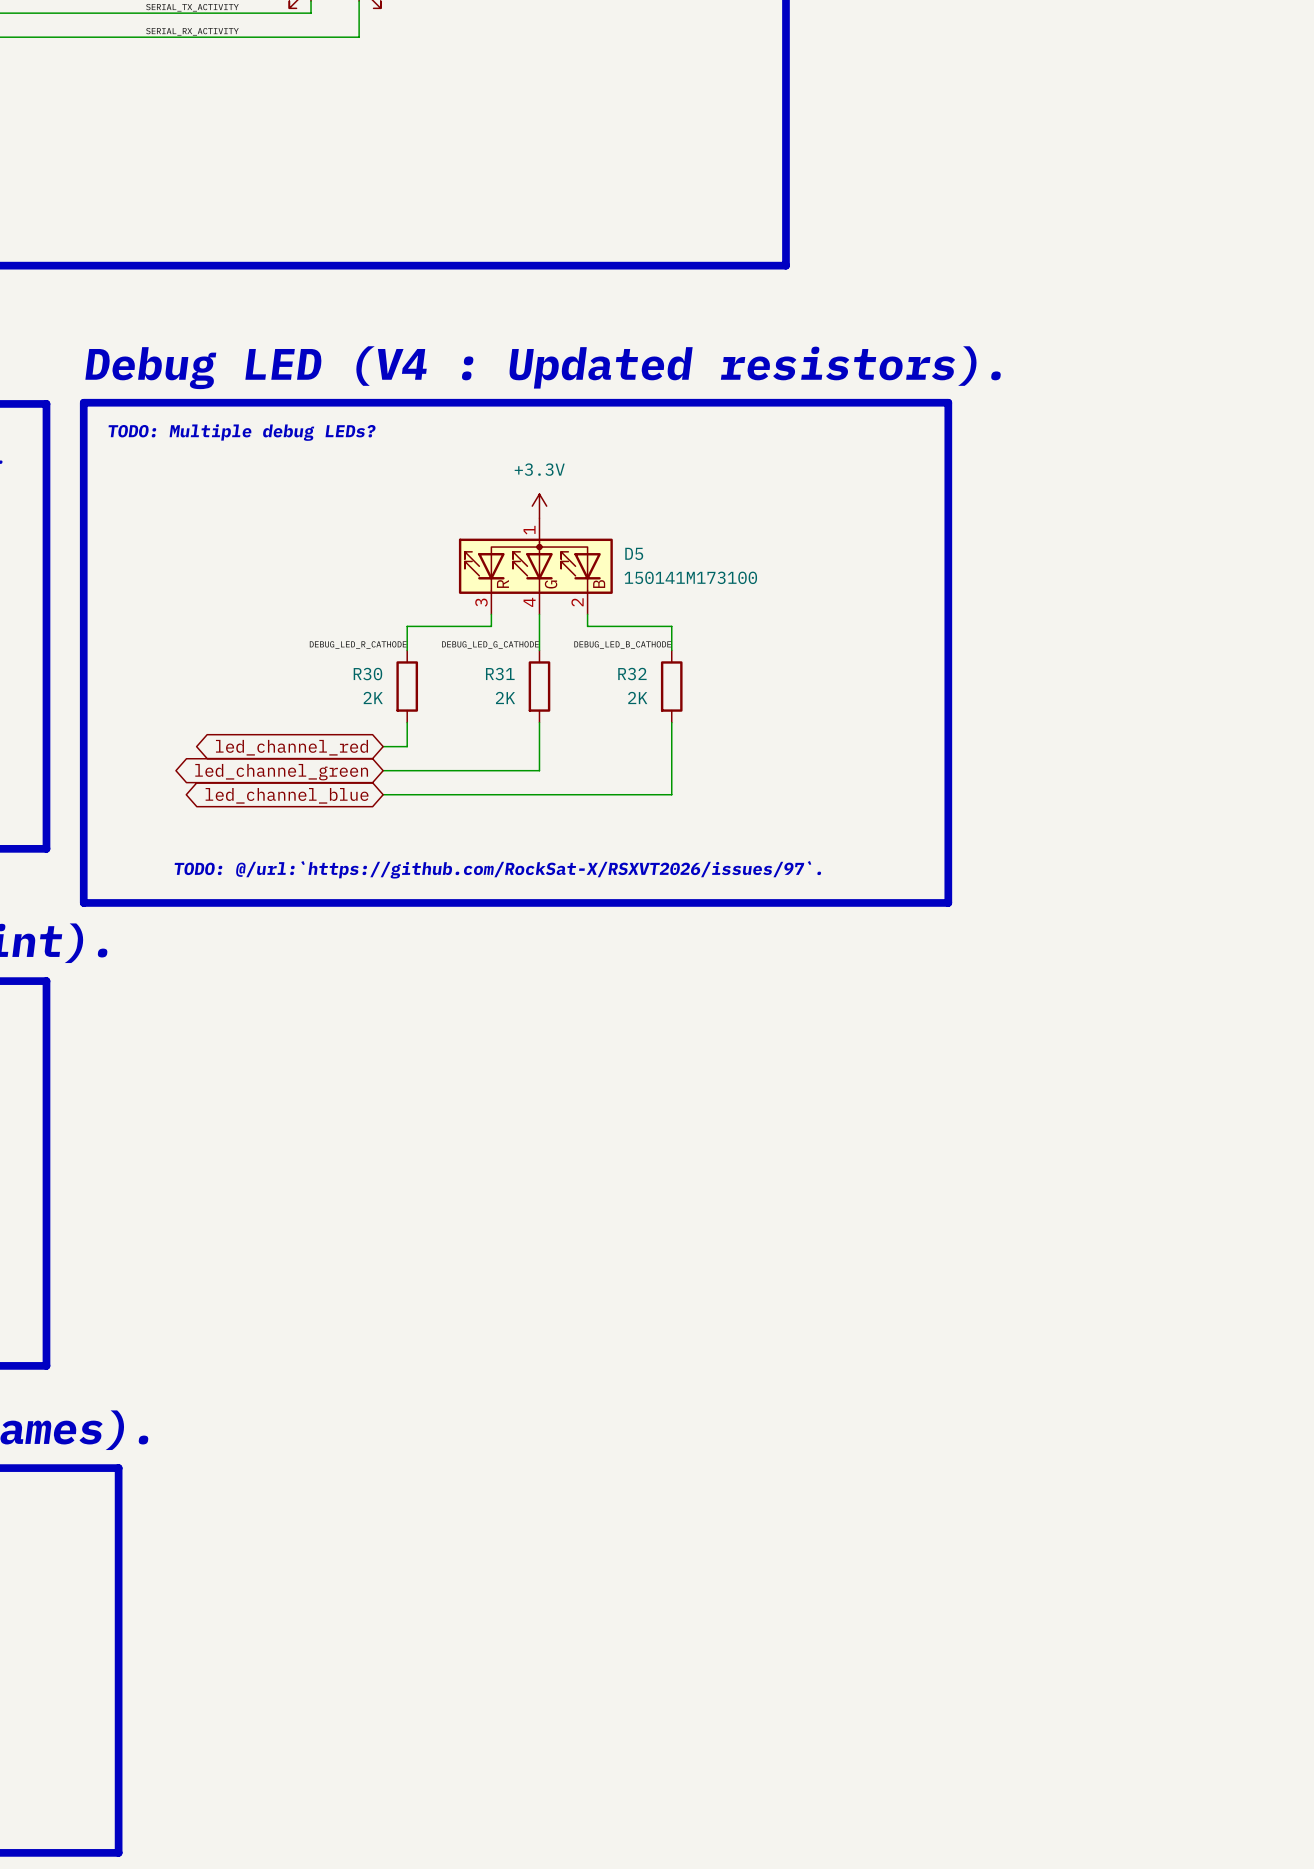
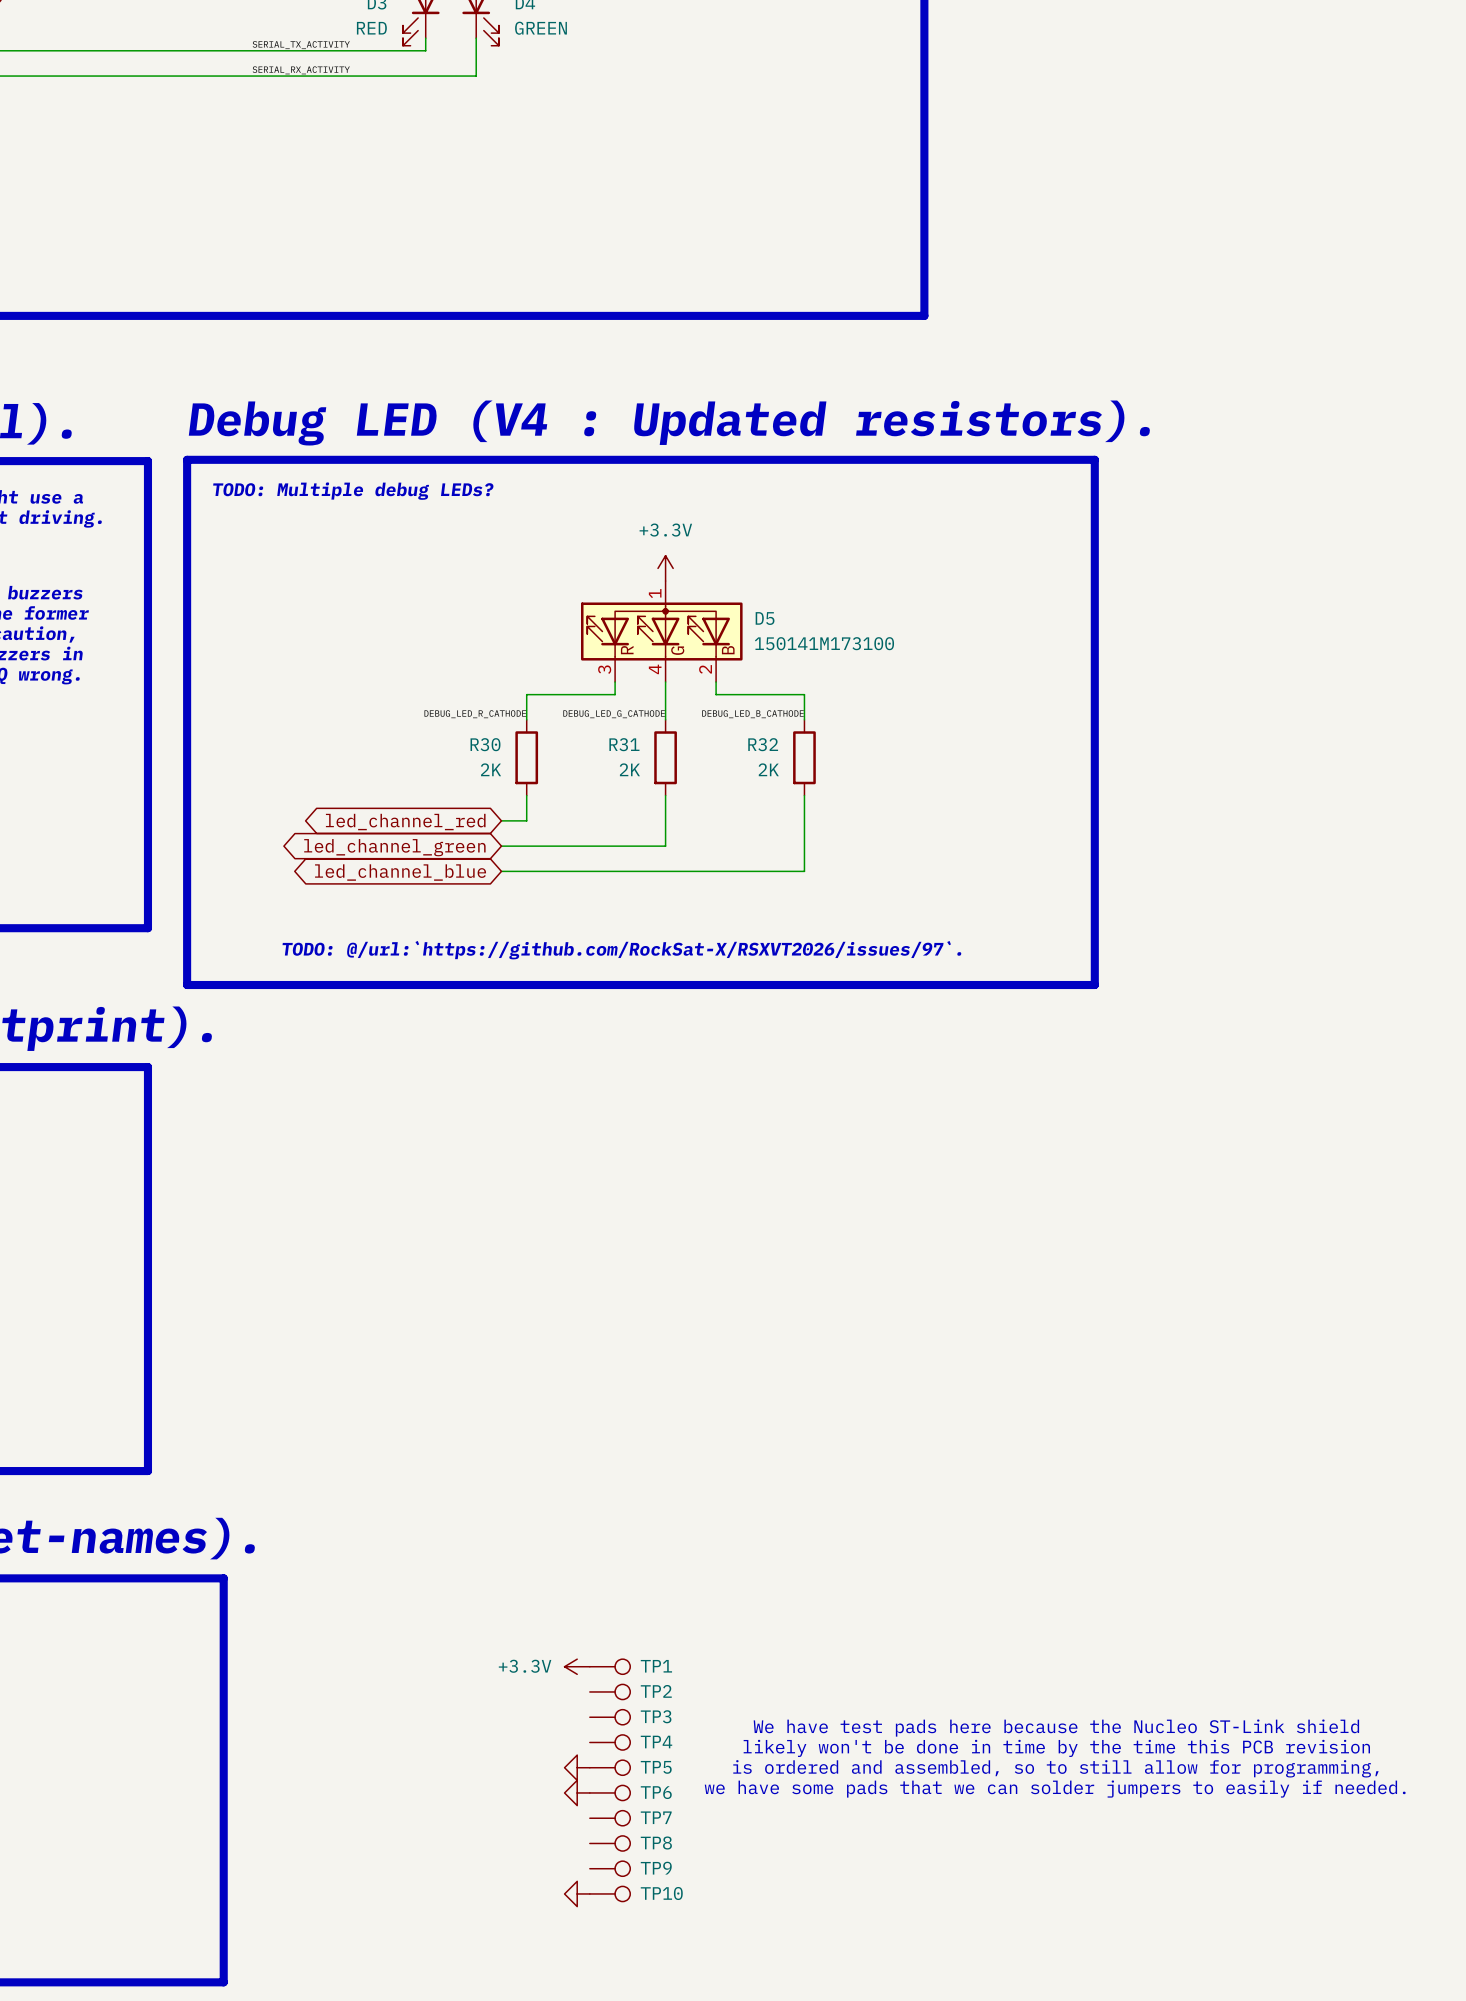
power symbol: none -> +3.3V (577, 1666)
TP1: none -> (610, 1666)
TP2: none -> (610, 1691)
TP3: none -> (610, 1717)
text: none -> We have test pads here because the Nucleo ST-Link shield (1056, 1728)
TP4: none -> (610, 1742)
text: none -> likely won't be done in time by the time this PCB revision (1056, 1748)
power symbol: none -> (577, 1767)
TP5: none -> (610, 1767)
text: none -> is ordered and assembled, so to still allow for programming, (1055, 1768)
text: none -> we have some pads that we can solder jumpers to easily if needed. (1055, 1789)
power symbol: none -> (577, 1792)
TP6: none -> (610, 1792)
TP7: none -> (610, 1818)
TP8: none -> (610, 1843)
TP9: none -> (610, 1868)
power symbol: none -> (577, 1893)
TP10: none -> (610, 1893)

